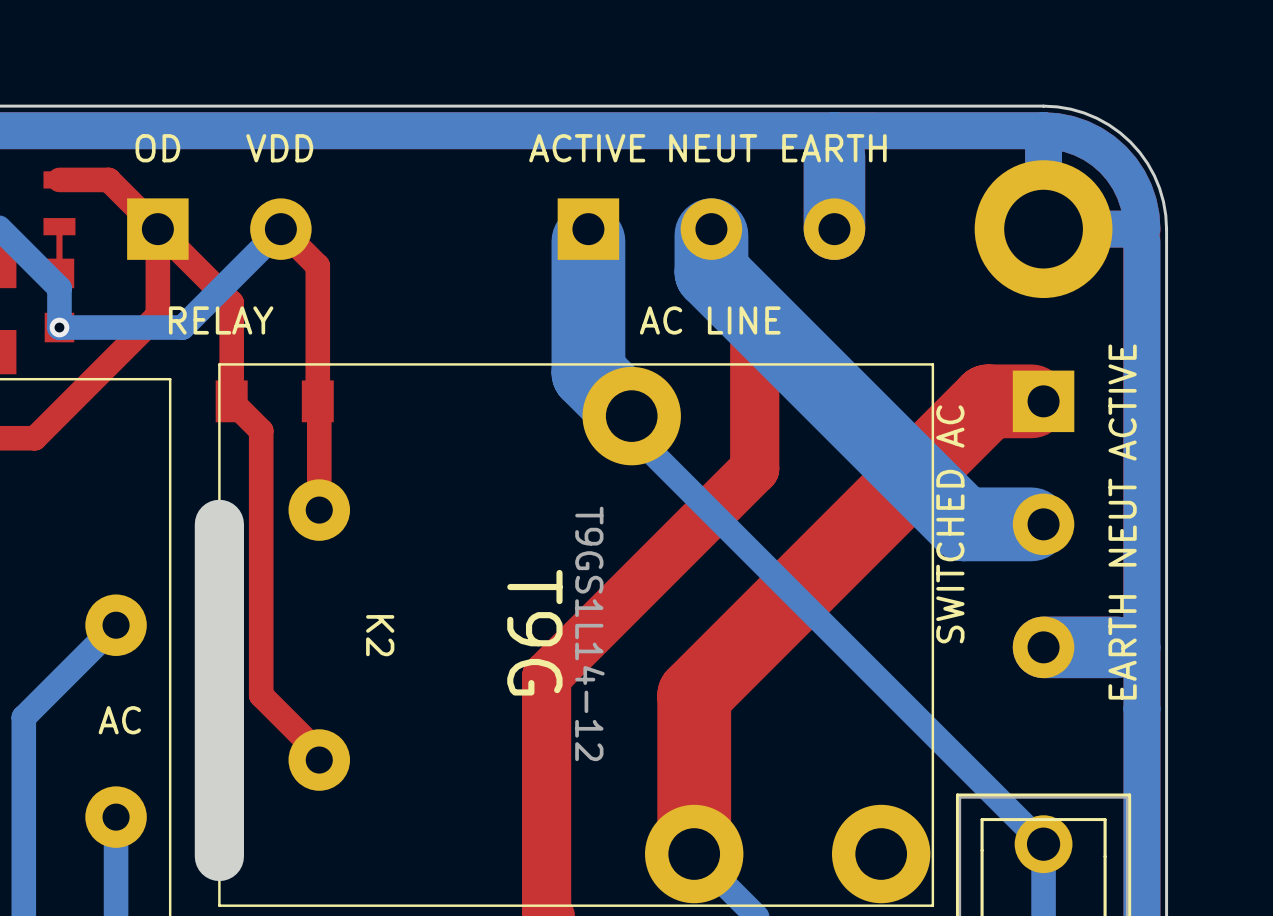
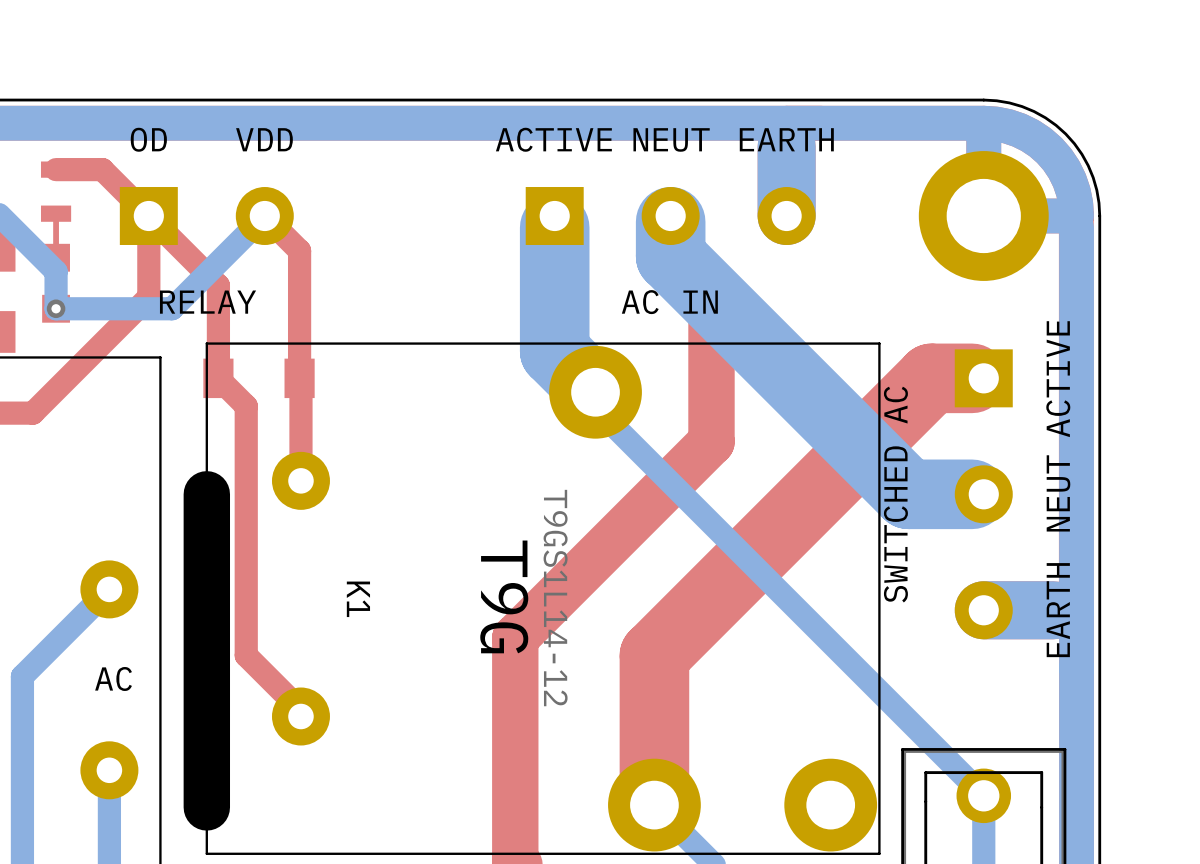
text: AC LINE (710, 320) -> AC IN (669, 302)
K2 name: K2 (380, 635) -> K1 (358, 599)

